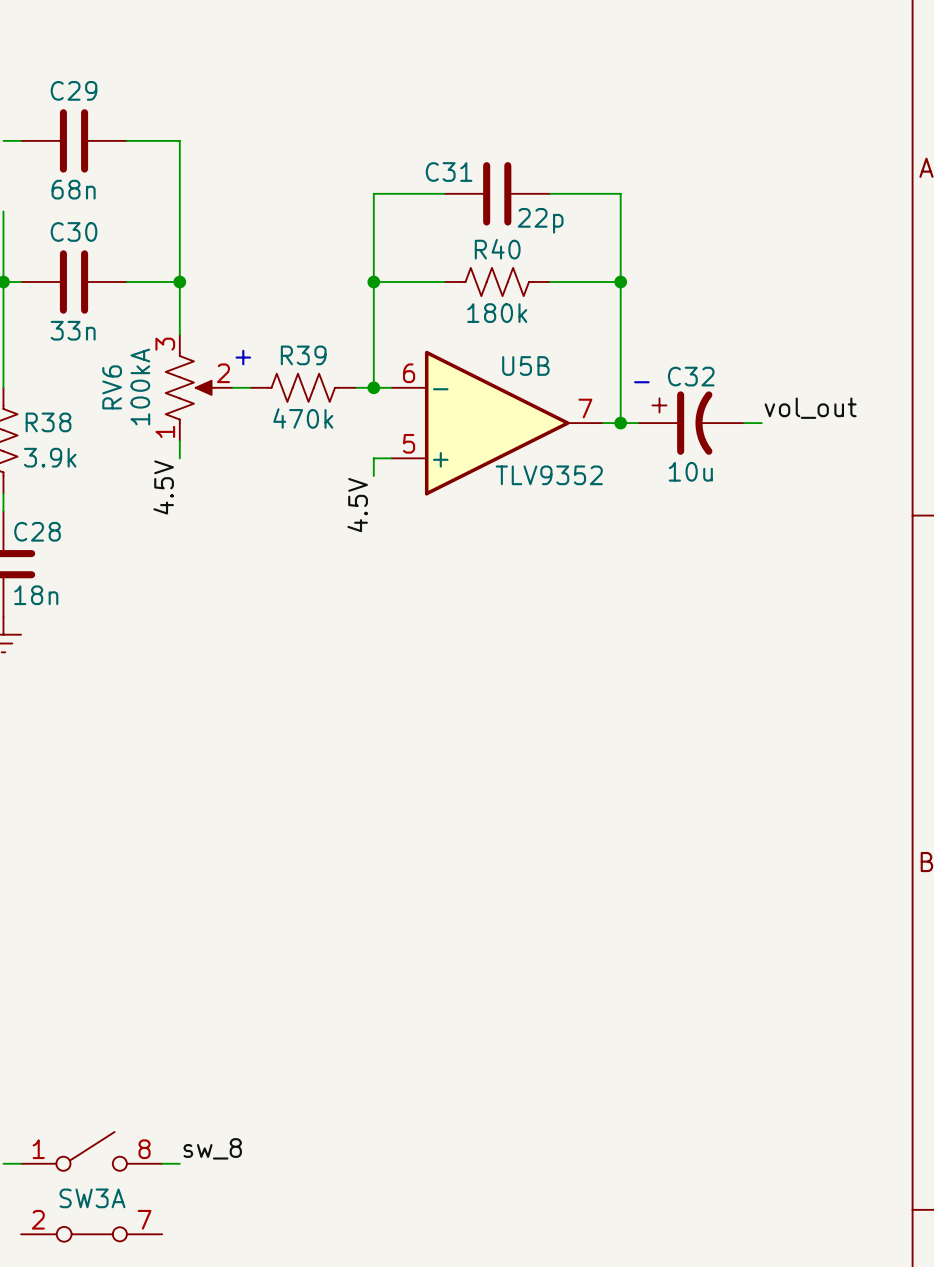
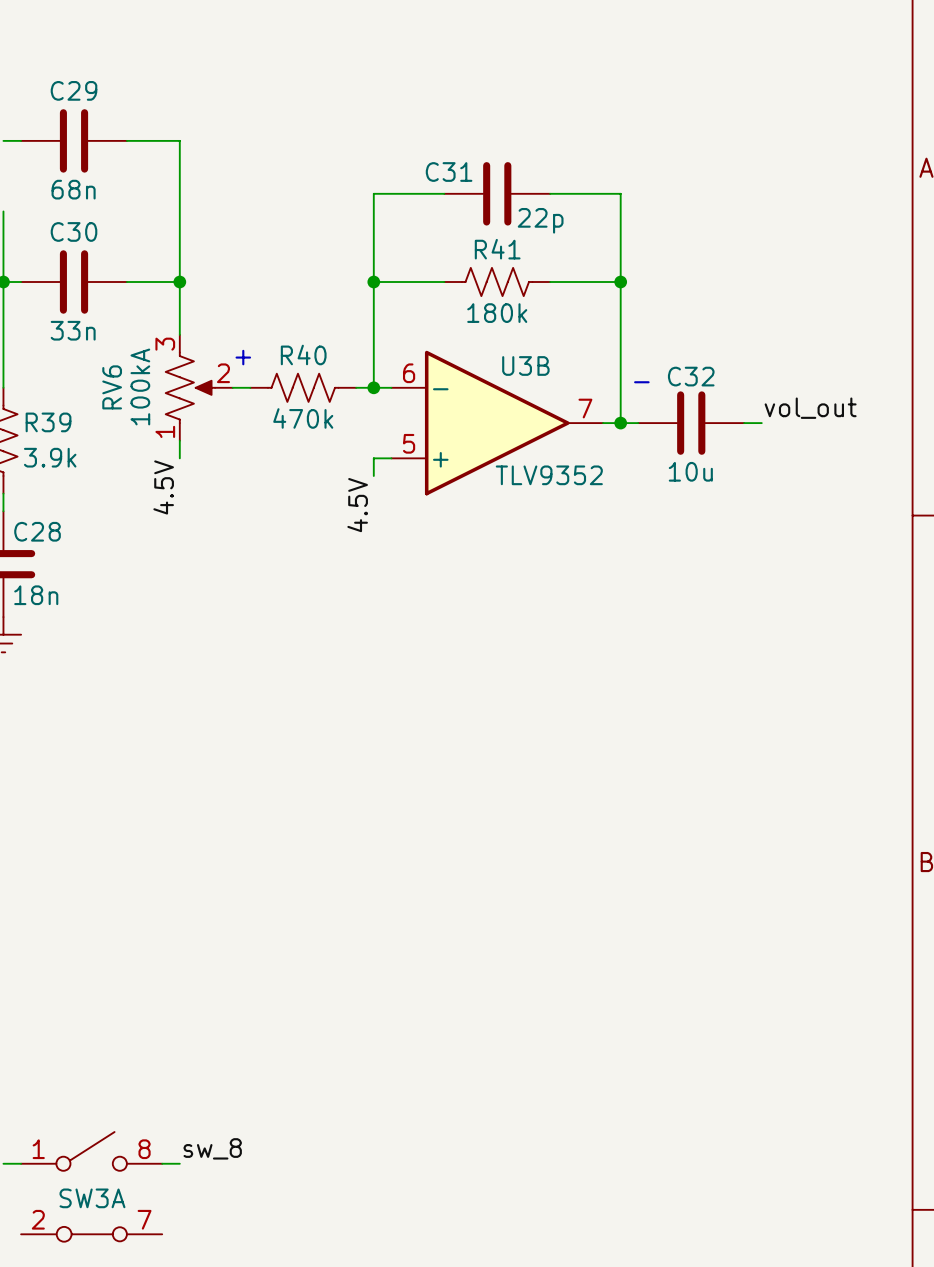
R40 name: R40 (497, 249) -> R41 (497, 249)
R39 name: R39 (303, 355) -> R40 (303, 354)
U5B name: U5B (525, 365) -> U3B (525, 365)
C32 symbol: [638, 391, 745, 455] -> [638, 391, 745, 455]
R38 name: R38 (48, 422) -> R39 (48, 422)

